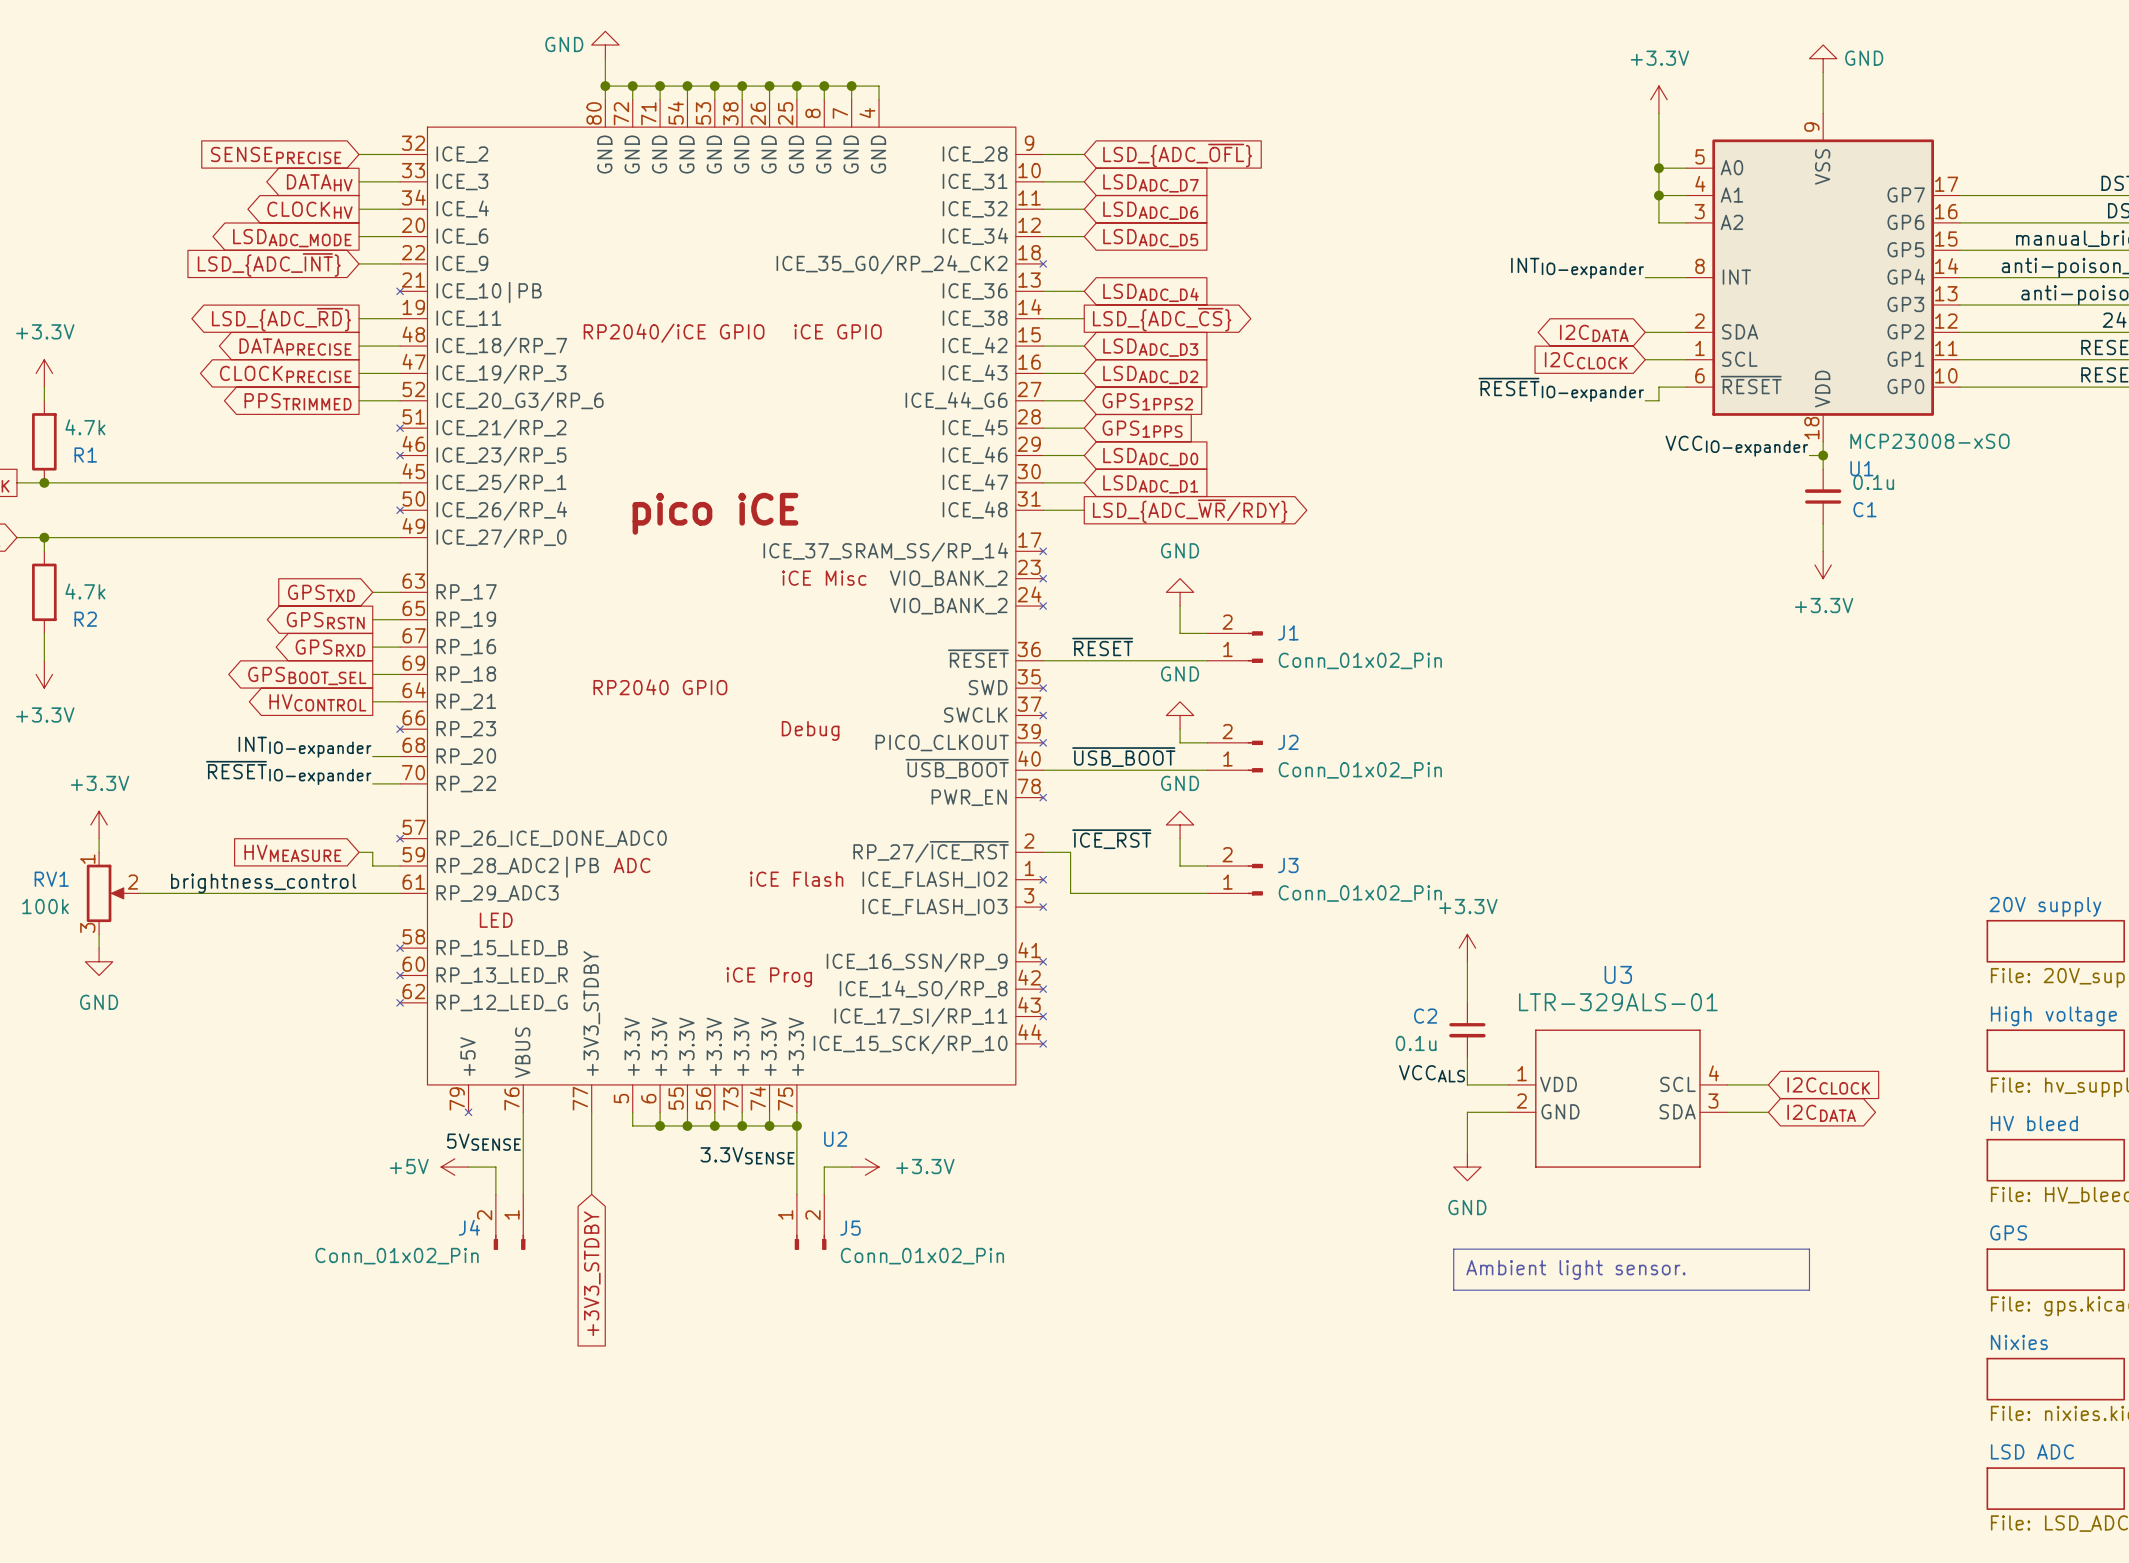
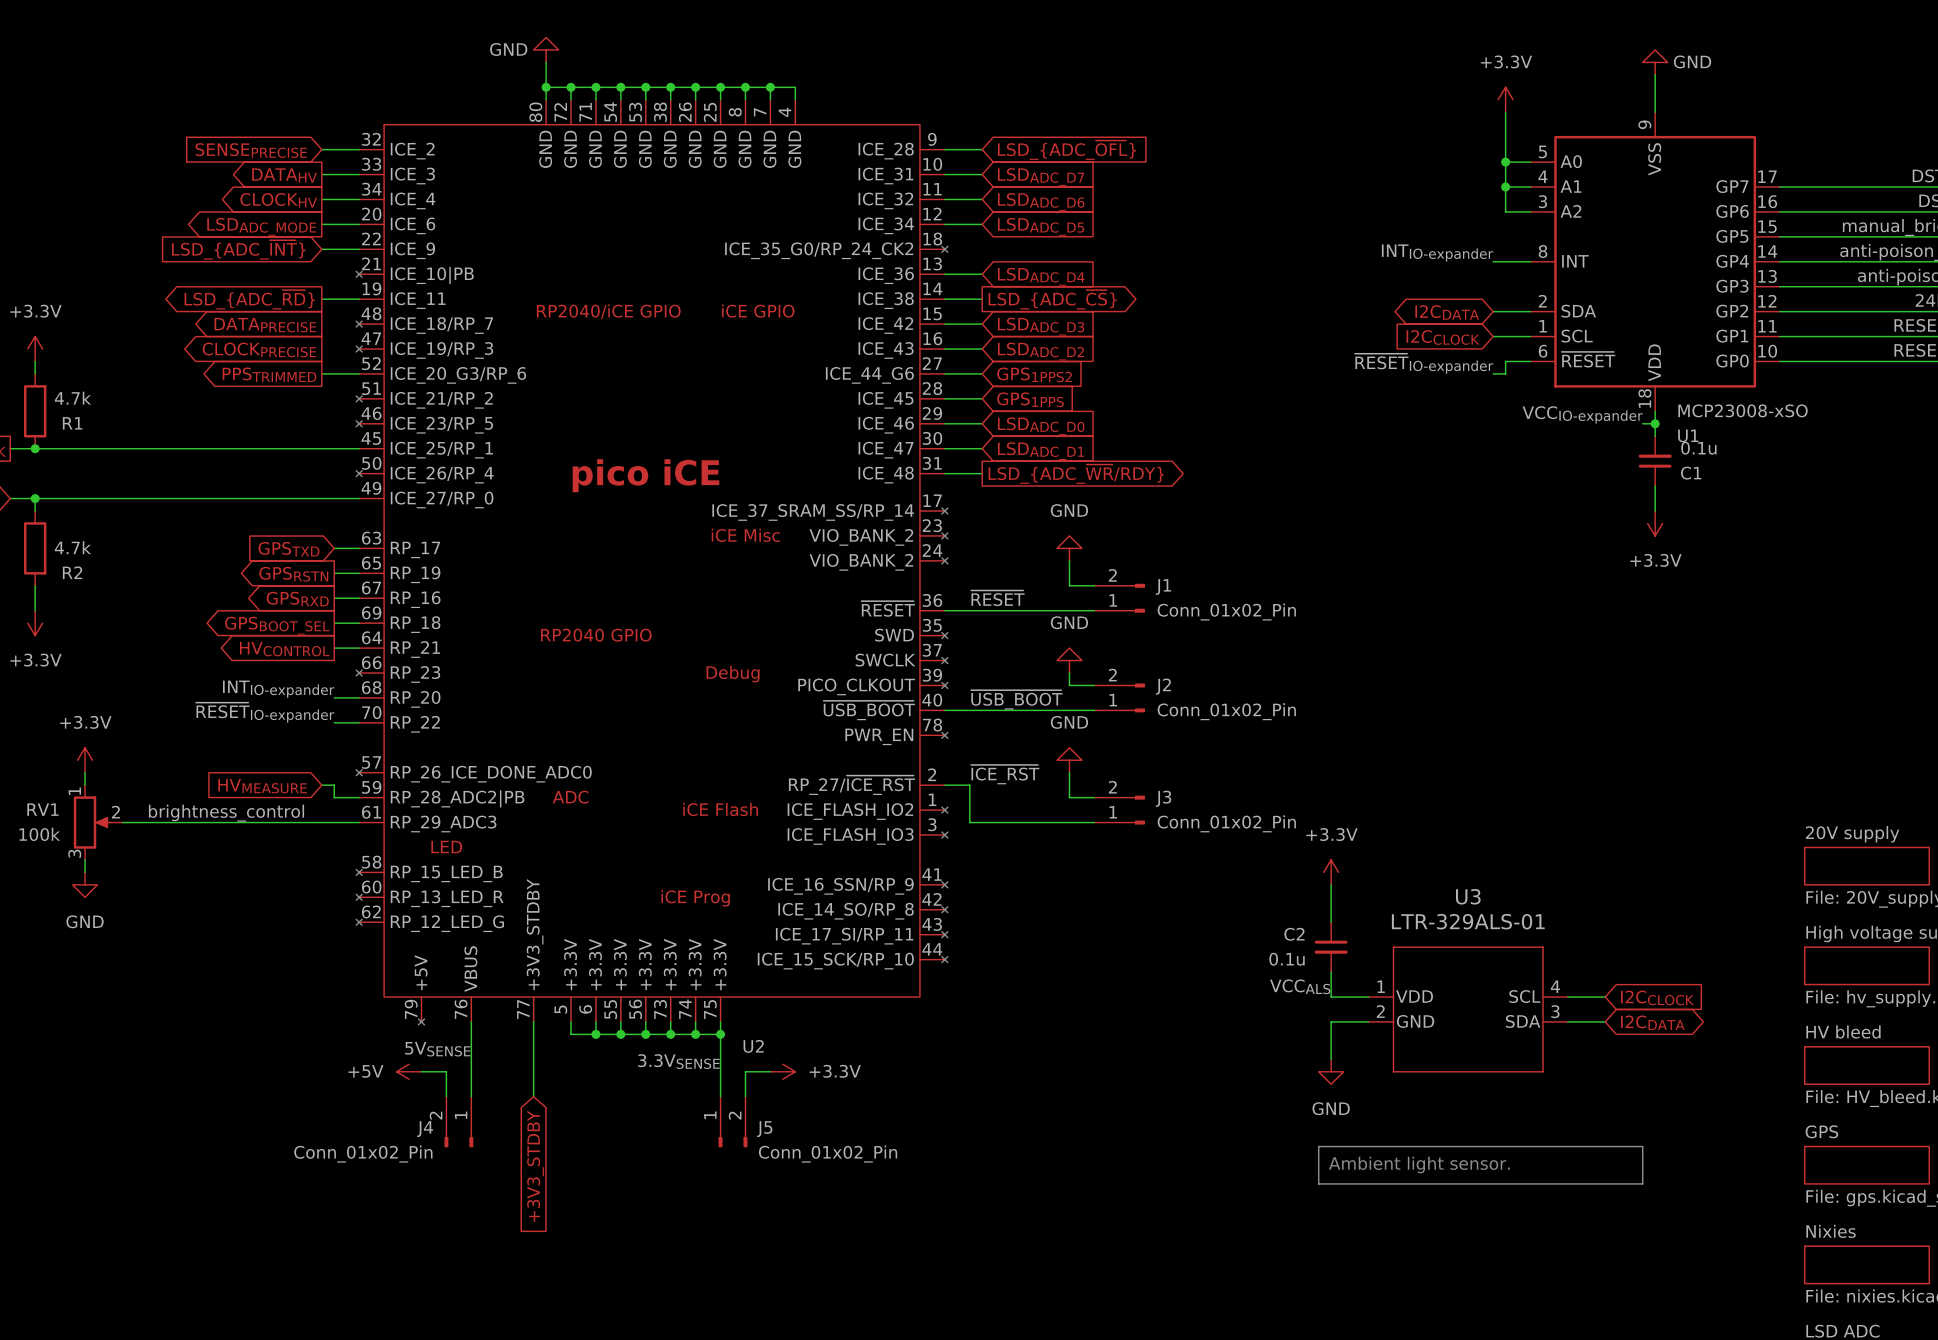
U2 symbol: [396, 99, 1047, 1116] -> [356, 99, 948, 1025]
wire: (359, 346) (400, 346) -> none
wire: (359, 373) (400, 373) -> none

